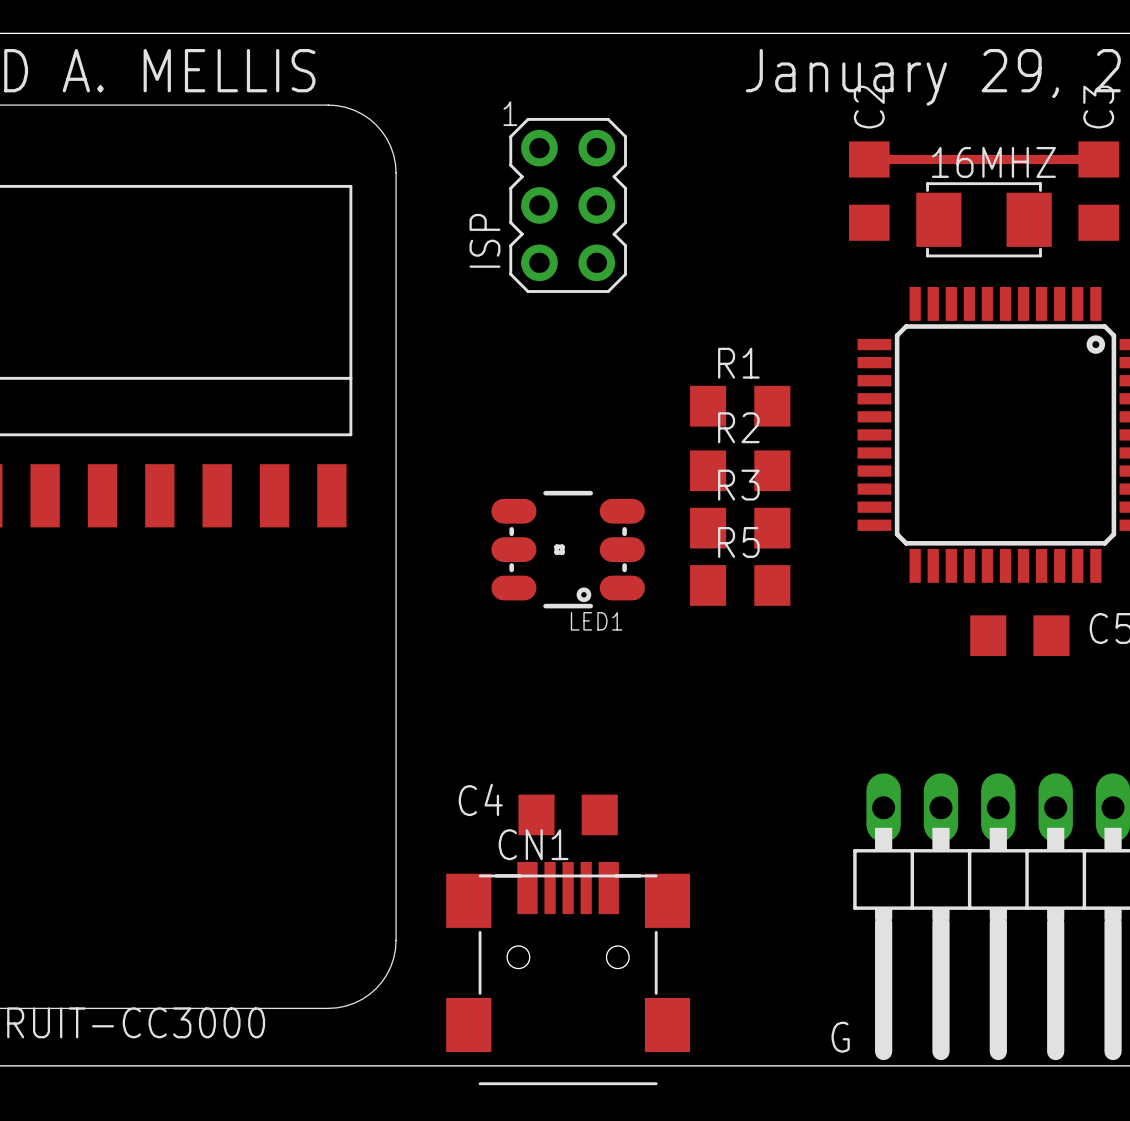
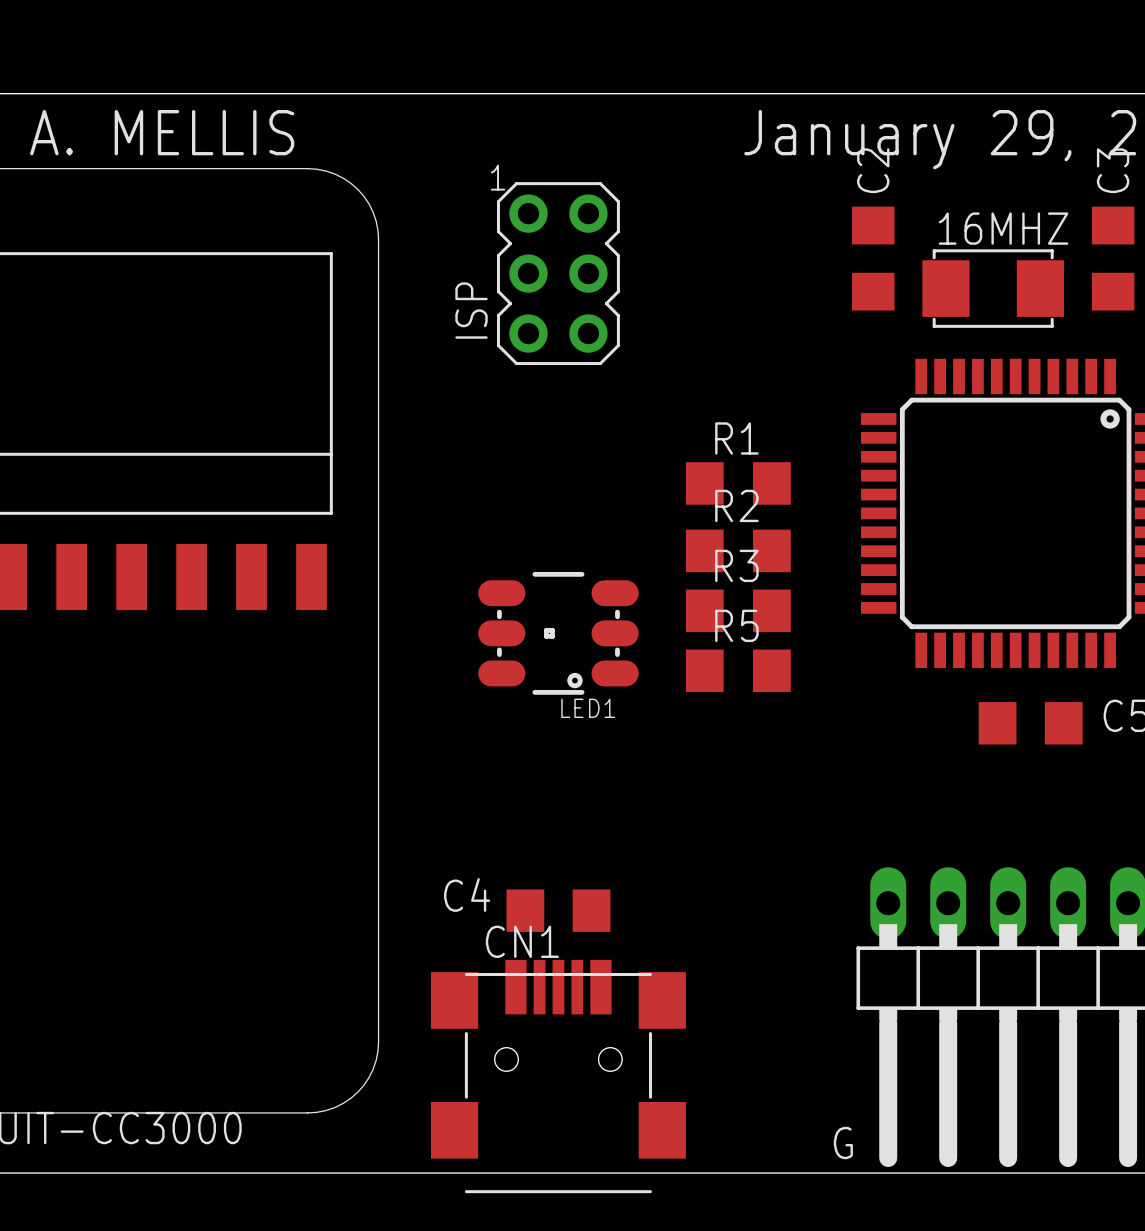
top track: (869, 159) (1098, 159) -> none

